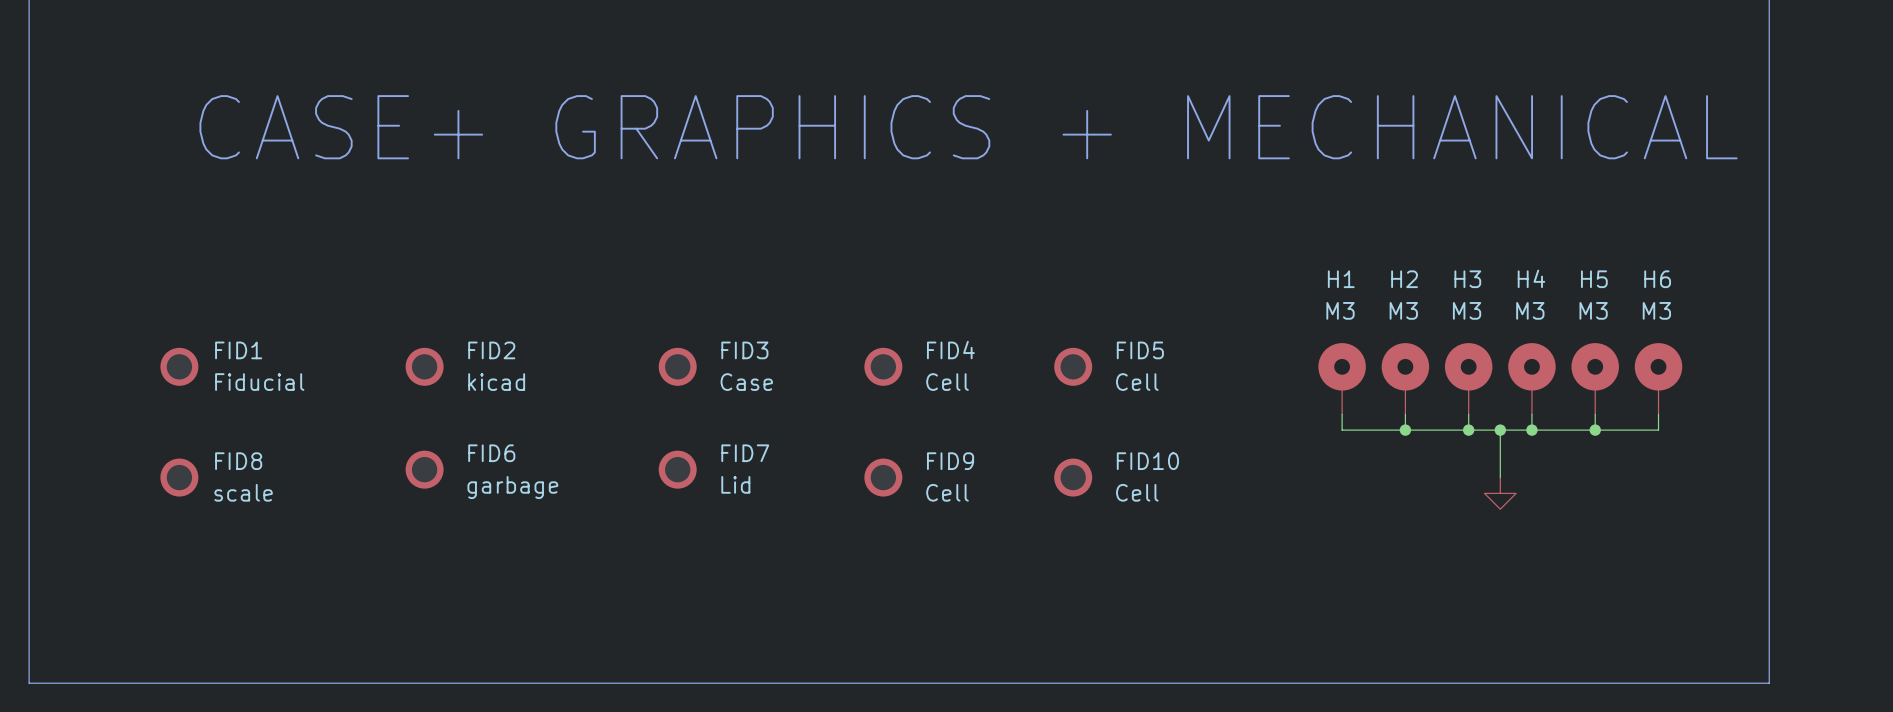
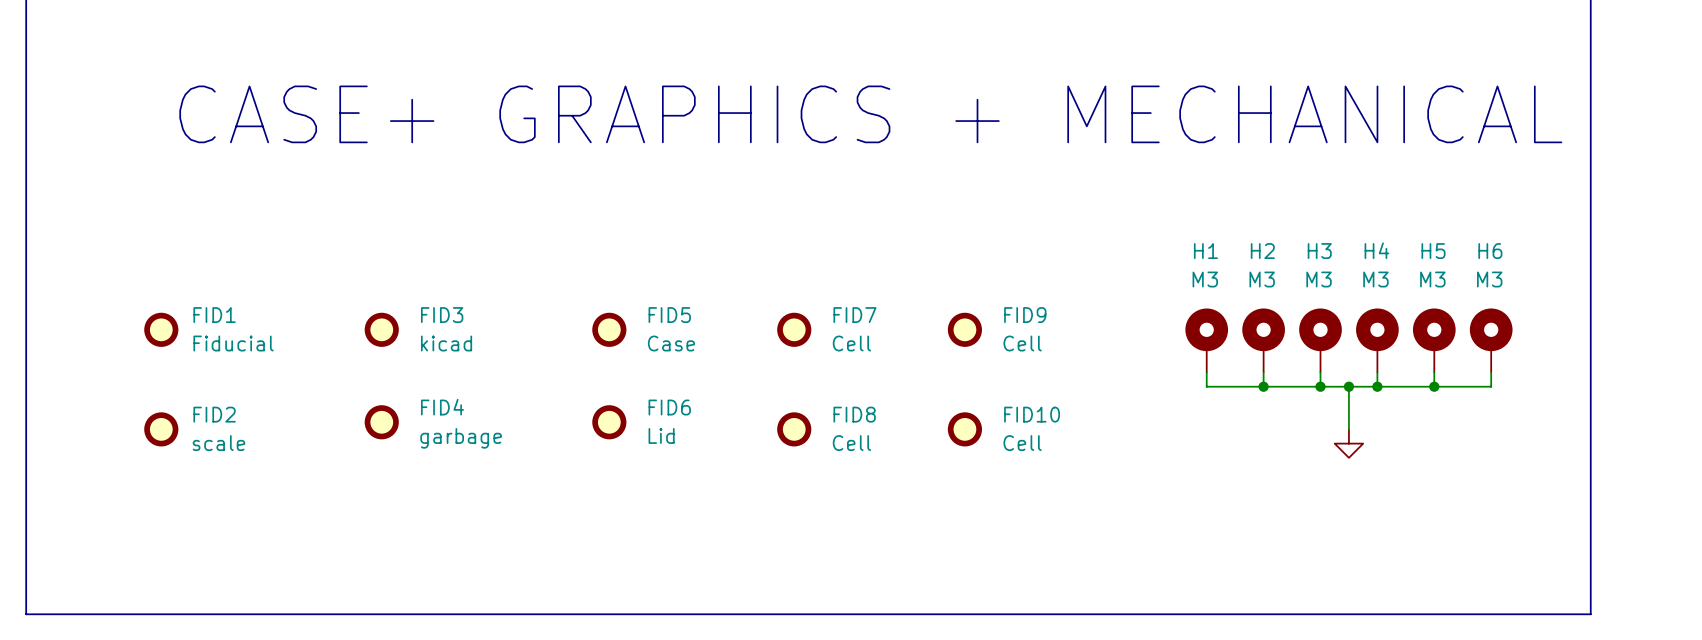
FID2 name: FID2 (491, 350) -> FID3 (442, 315)
FID3 name: FID3 (744, 350) -> FID5 (669, 315)
FID4 name: FID4 (950, 350) -> FID7 (854, 315)
FID5 name: FID5 (1140, 350) -> FID9 (1025, 315)
FID6 name: FID6 (491, 453) -> FID4 (442, 407)
FID7 name: FID7 (745, 453) -> FID6 (669, 407)
FID8 name: FID8 (238, 461) -> FID2 (214, 414)
FID9 name: FID9 (950, 461) -> FID8 (854, 414)

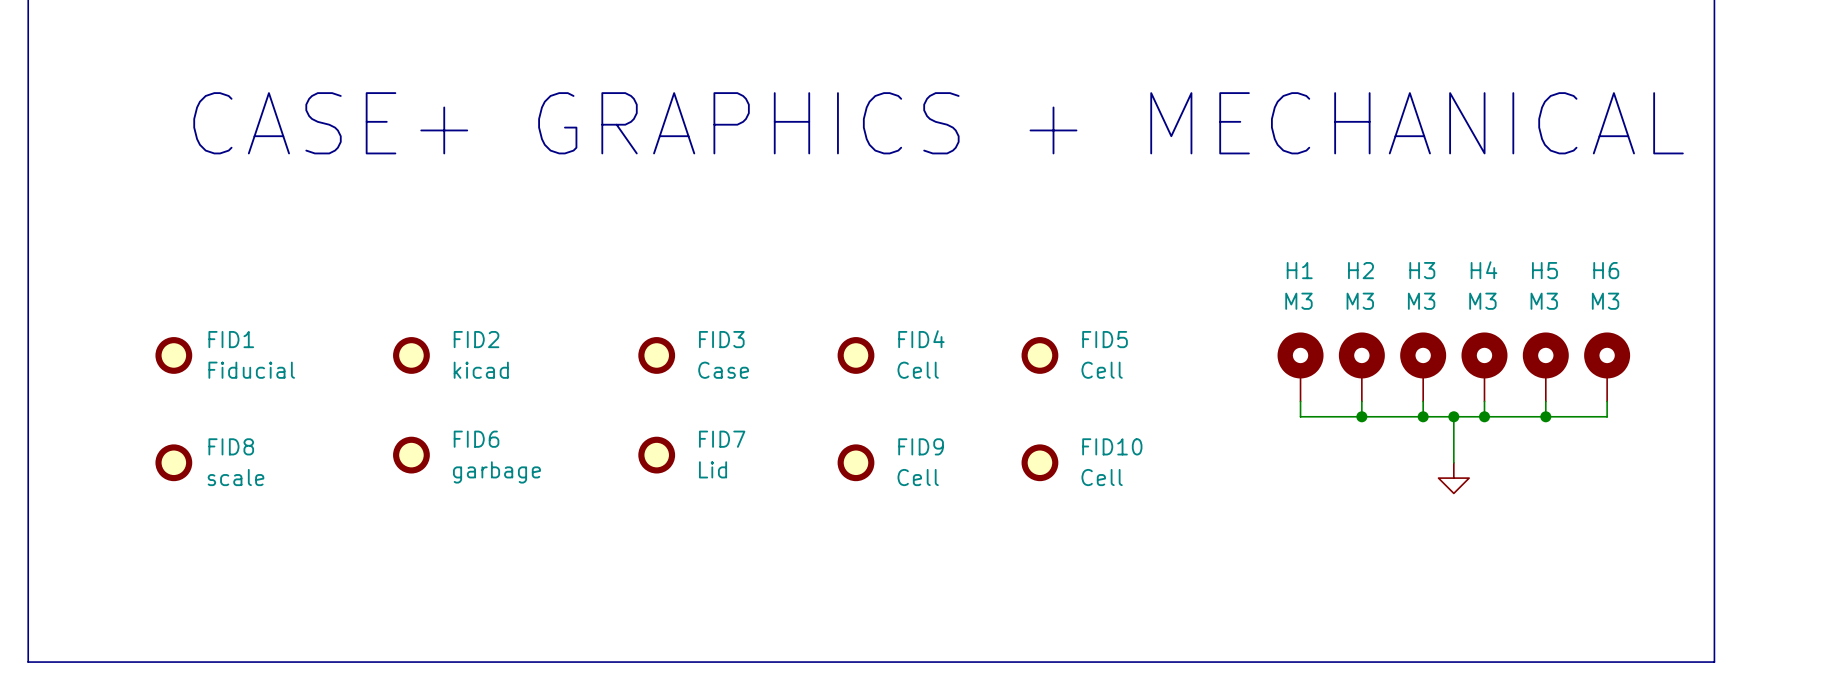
FID3 name: FID3 (442, 315) -> FID2 (476, 339)
FID5 name: FID5 (669, 315) -> FID3 (721, 339)
FID7 name: FID7 (854, 315) -> FID4 (921, 339)
FID9 name: FID9 (1025, 315) -> FID5 (1105, 339)
FID4 name: FID4 (442, 407) -> FID6 (476, 439)
FID6 name: FID6 (669, 407) -> FID7 (722, 439)
FID2 name: FID2 (214, 414) -> FID8 (231, 446)
FID8 name: FID8 (854, 414) -> FID9 (921, 446)

